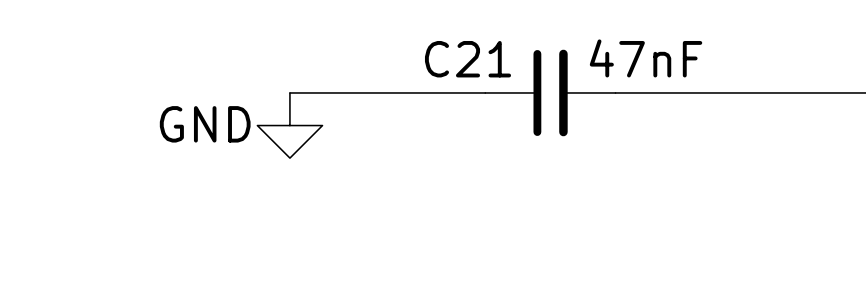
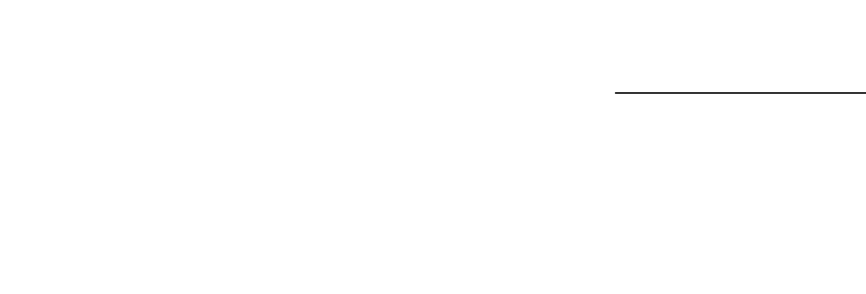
wire: (289, 92) (485, 92) -> none
C21: 47nF (550, 92) -> none
power symbol: GND (289, 125) -> none

